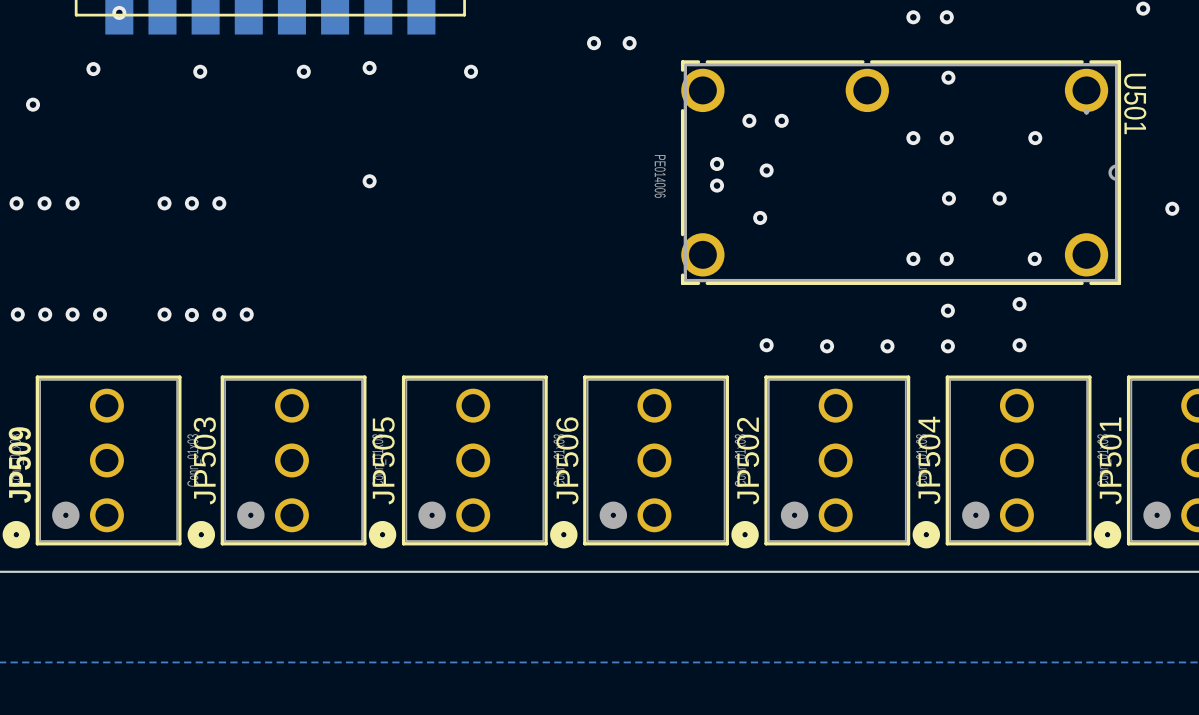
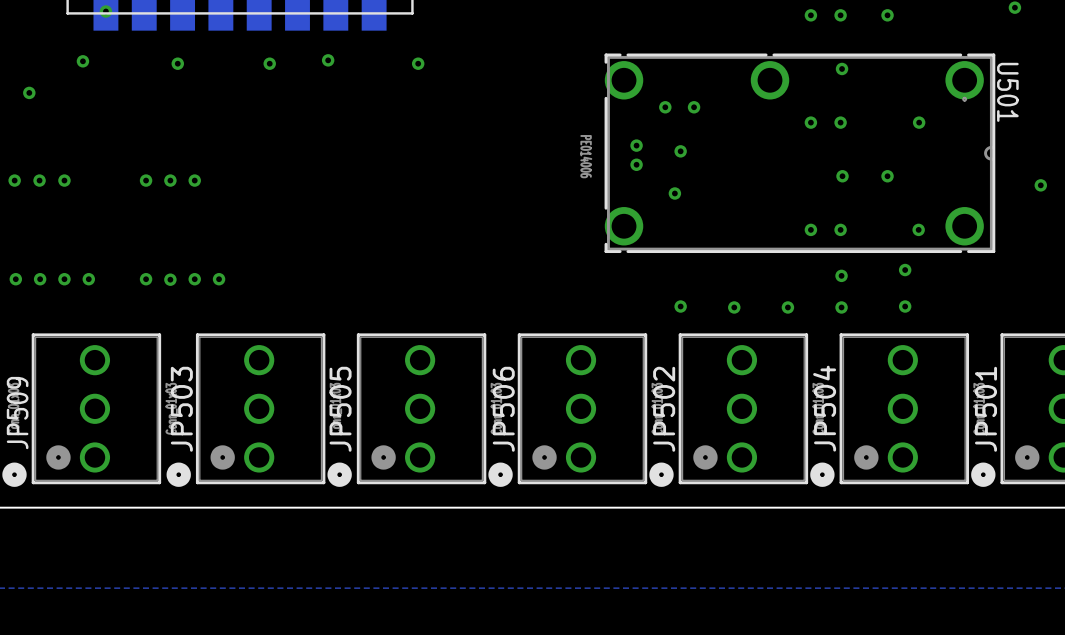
via: none -> (887, 15)
via: (594, 43) -> none
via: (629, 43) -> none
via: (369, 181) -> none

